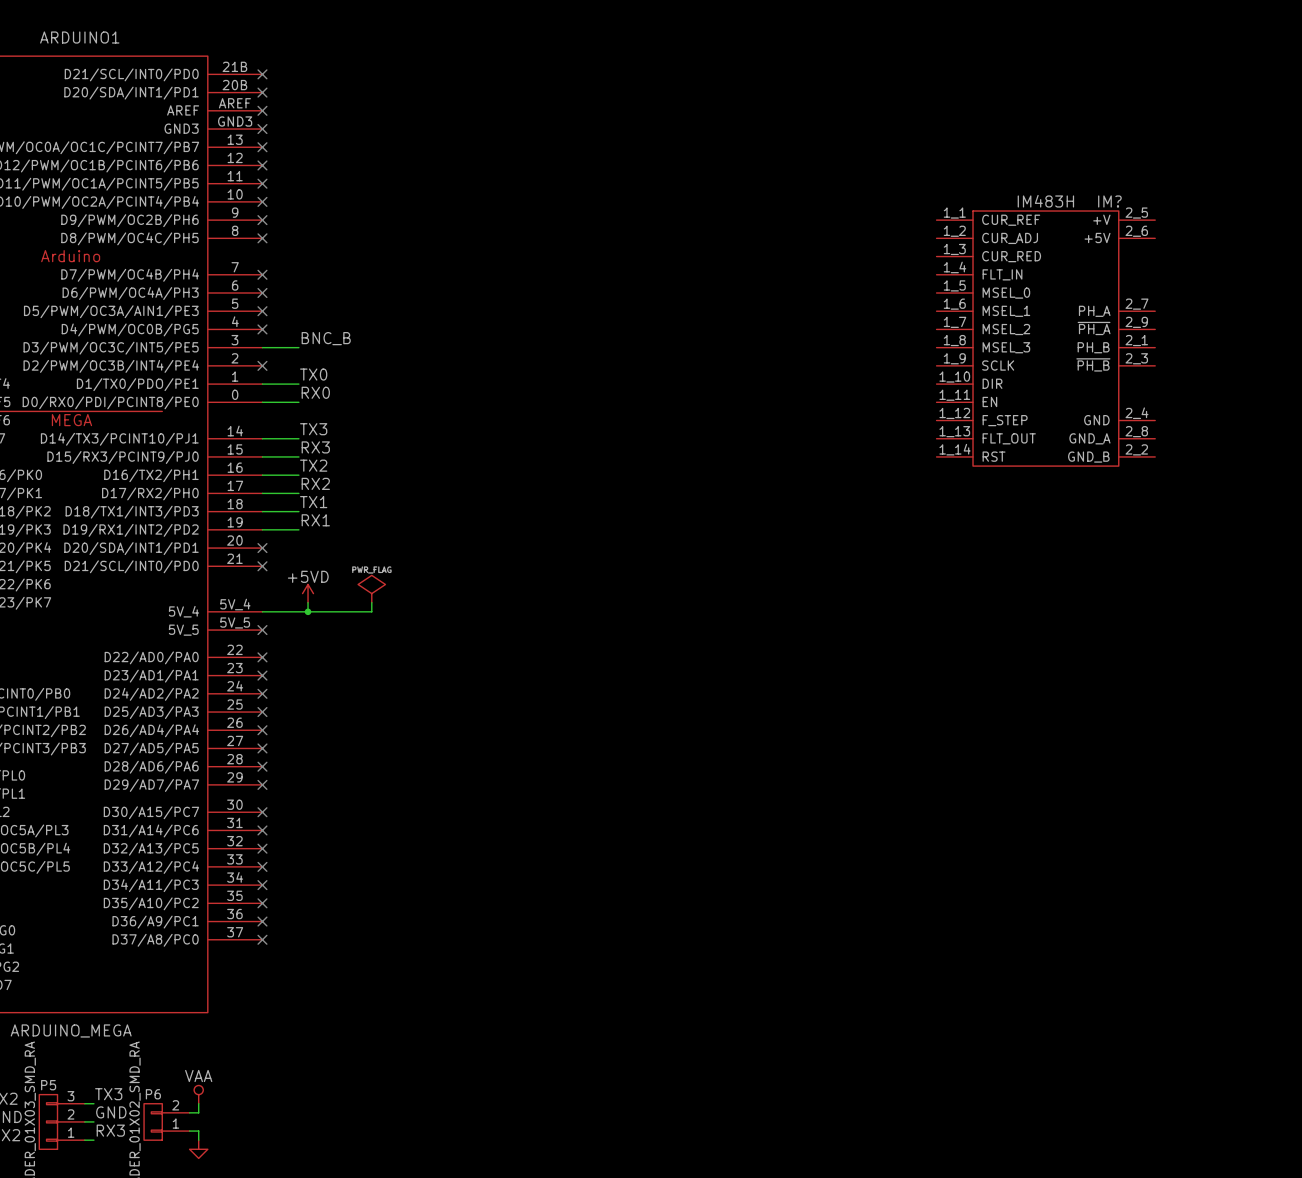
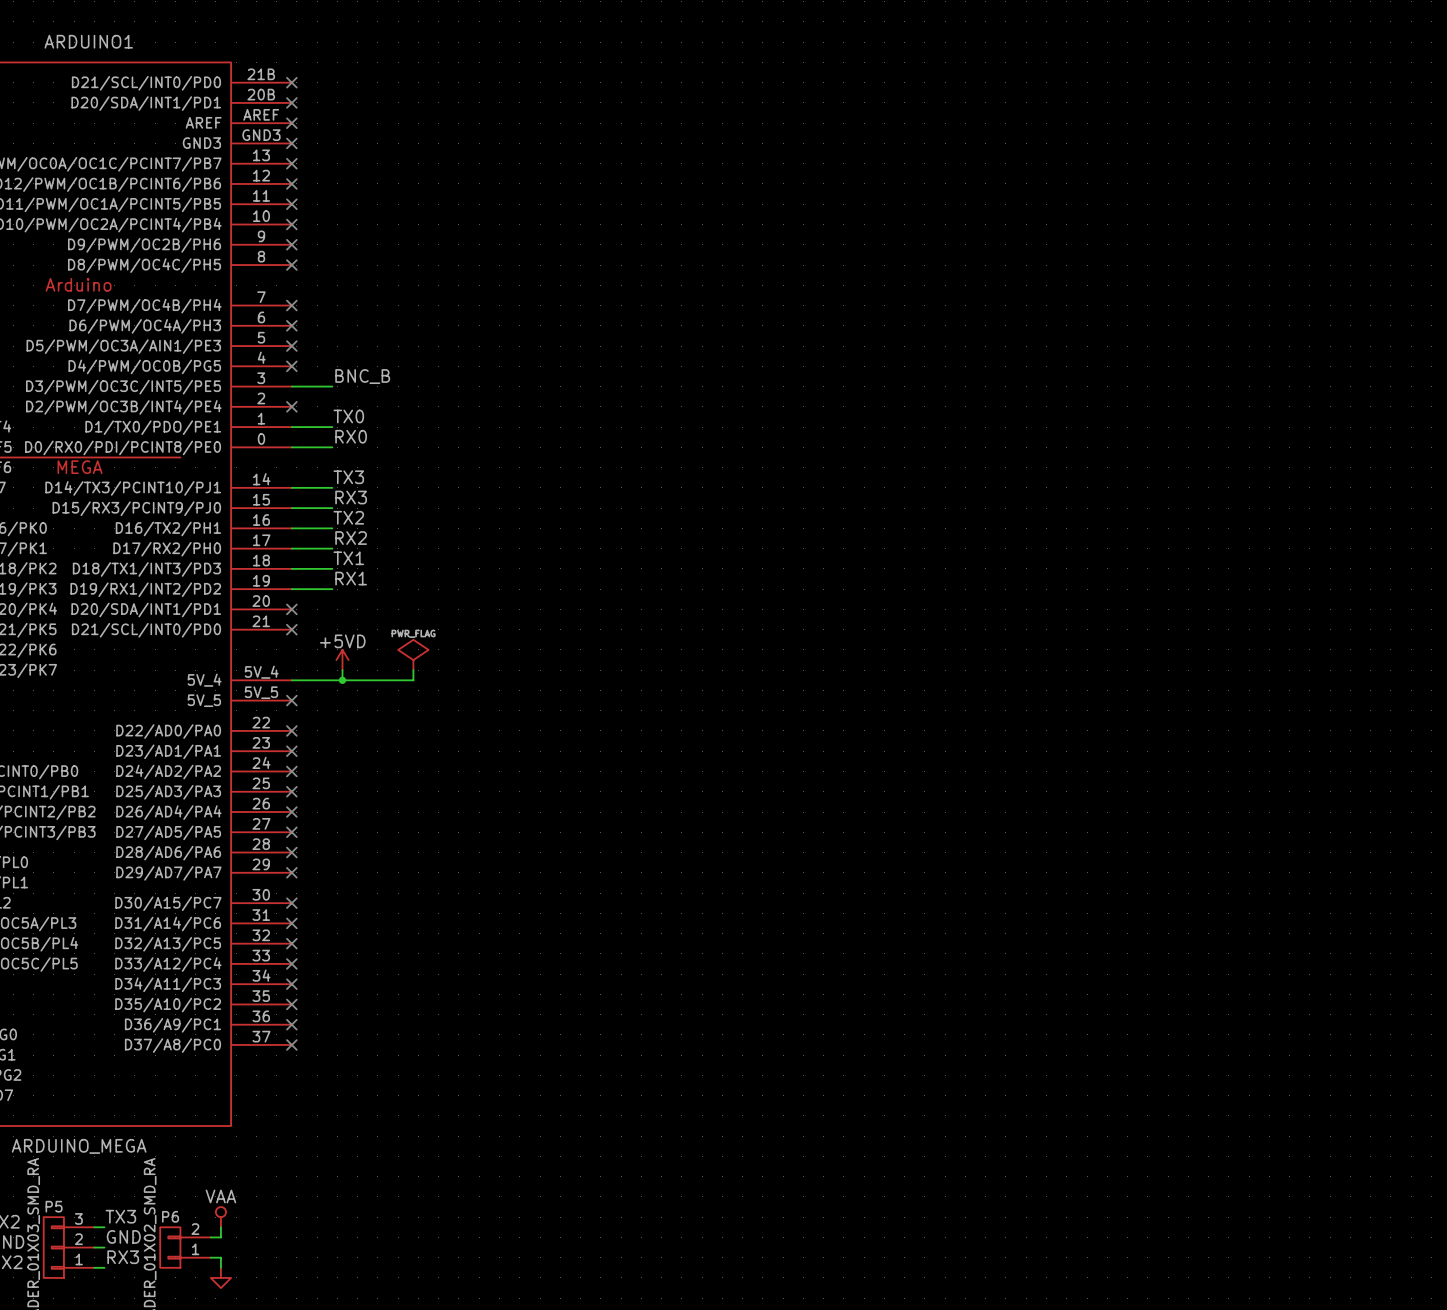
IM?: IM483H (1045, 338) -> none

